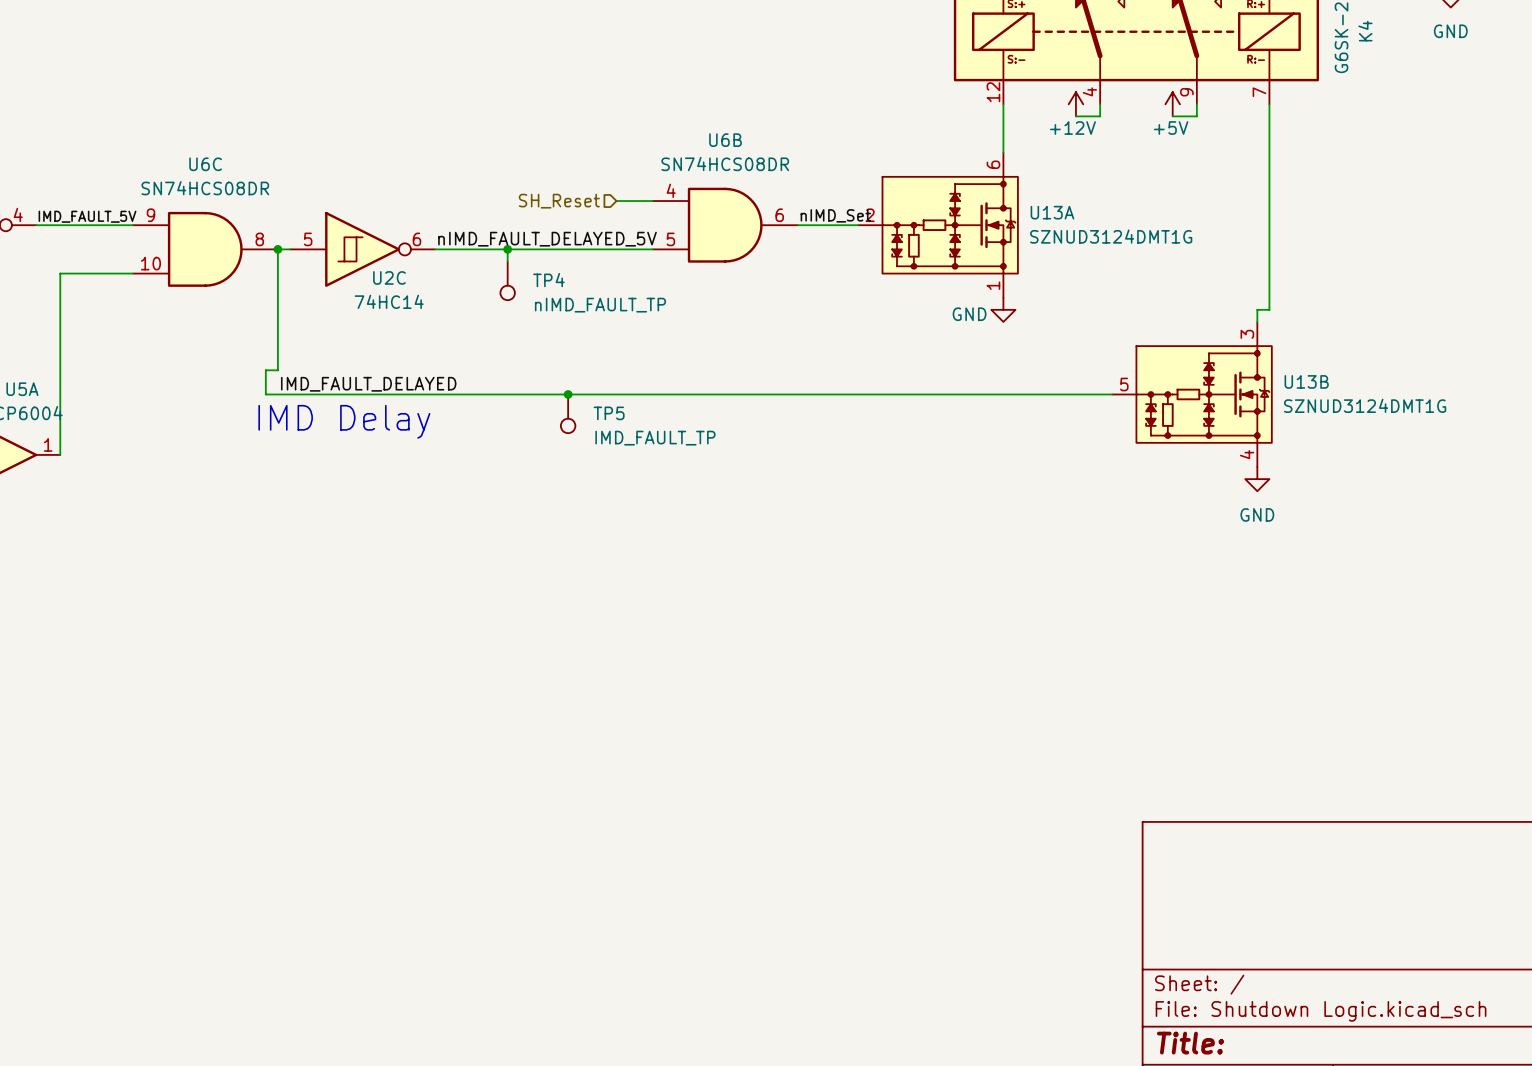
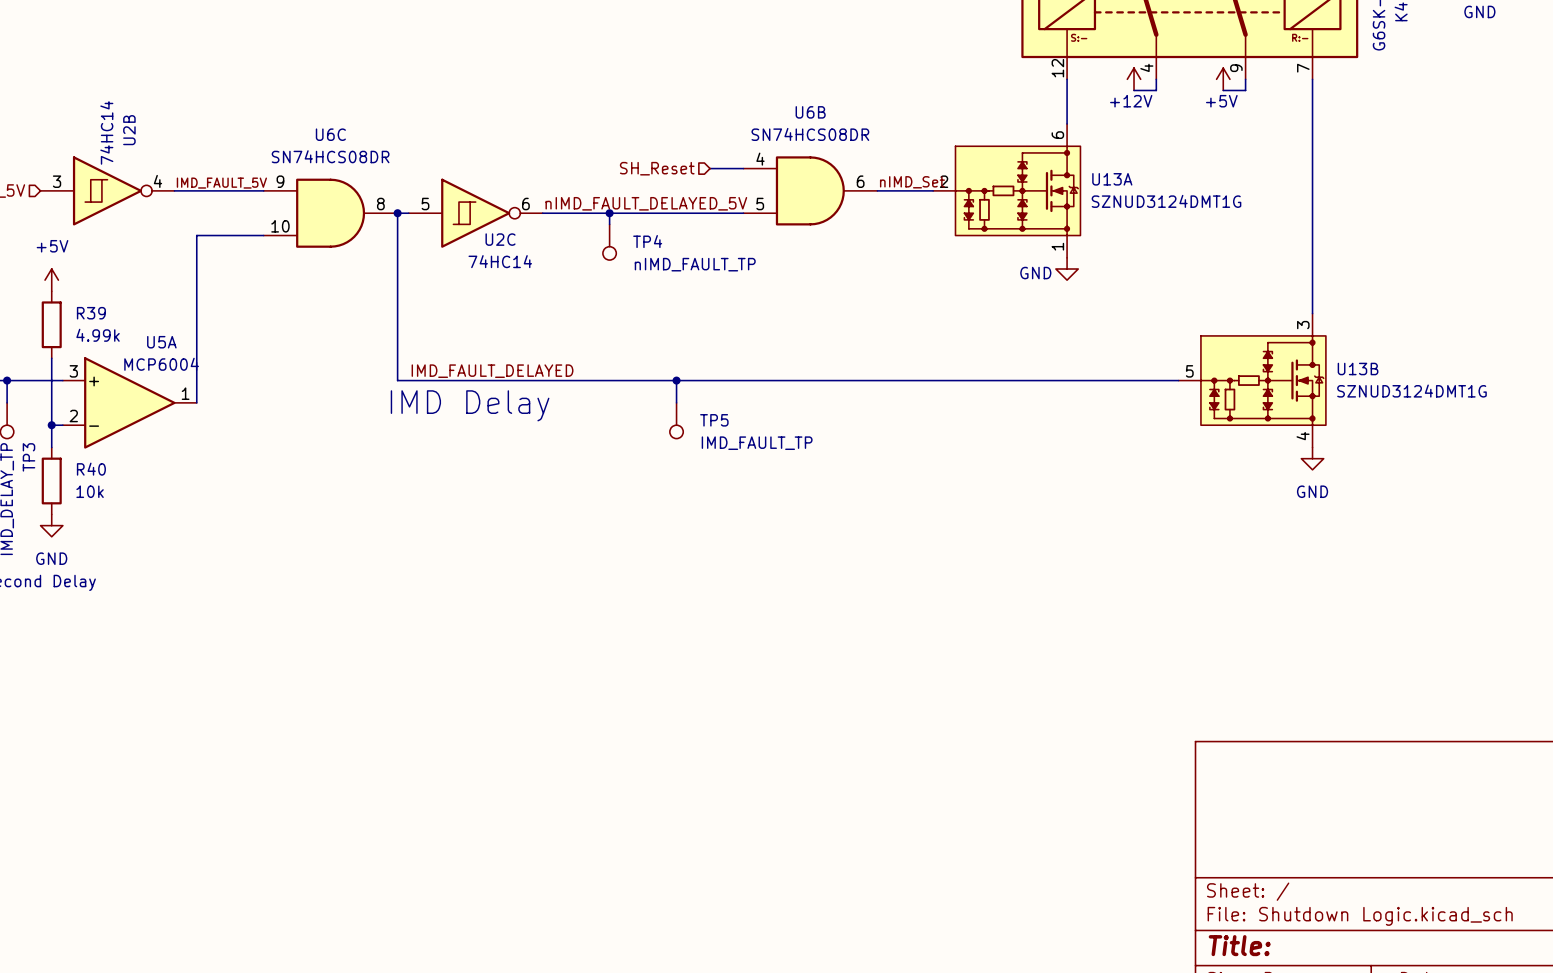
wire: (1269, 309) (1257, 309) (1257, 321) -> (1312, 269) (1312, 313)
wire: (277, 370) (265, 370) (265, 394) (1112, 394) -> (397, 324) (397, 380) (1178, 380)
label position: IMD_FAULT_DELAYED (368, 384) -> IMD_FAULT_DELAYED (492, 371)
junction position: (568, 394) -> (676, 380)
U13B position: (1192, 394) -> (1252, 380)
TP5 position: (568, 413) -> (676, 420)
text position: IMD Delay (344, 421) -> IMD Delay (470, 405)
wire: none -> (676, 380) (676, 402)
power symbol position: GND (1257, 479) -> GND (1312, 458)

